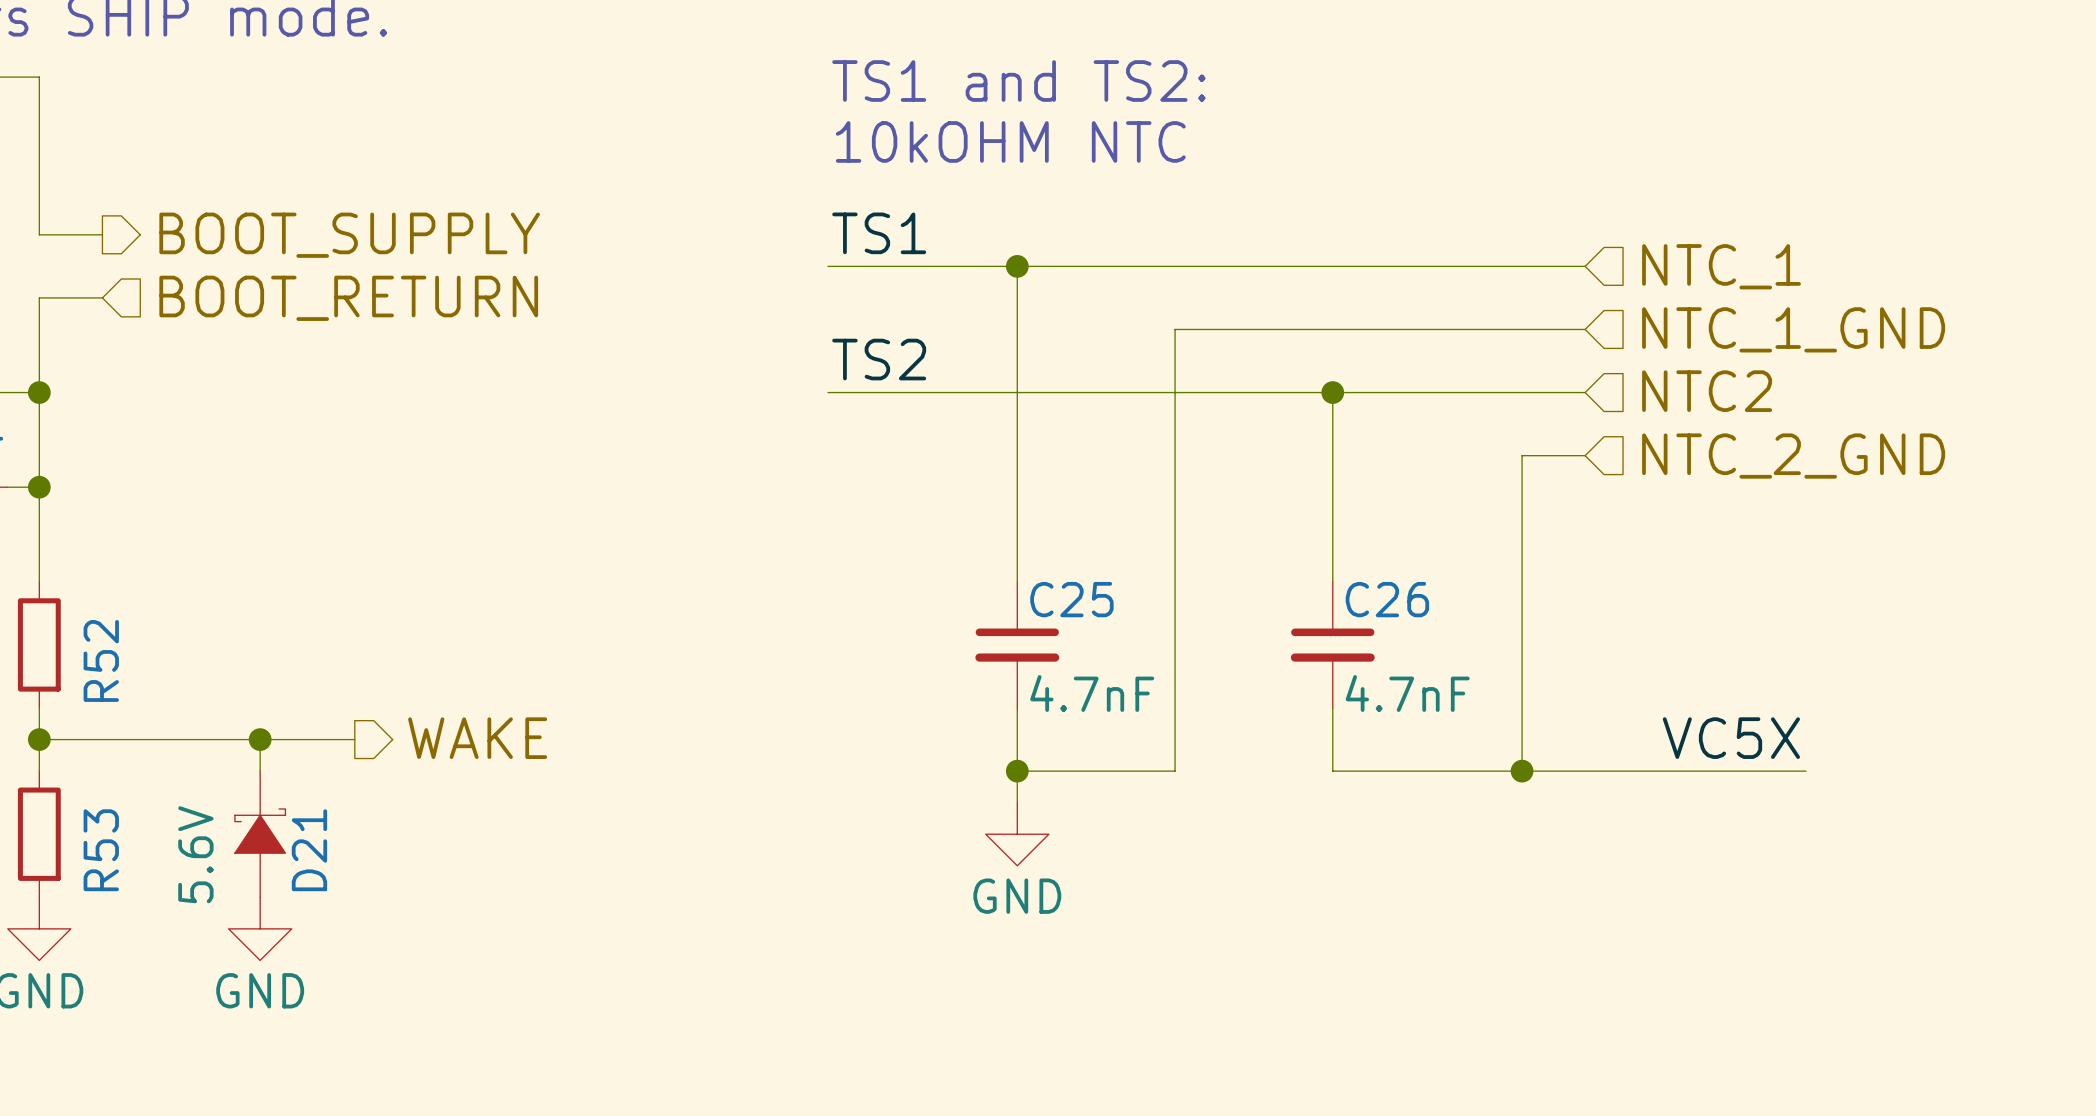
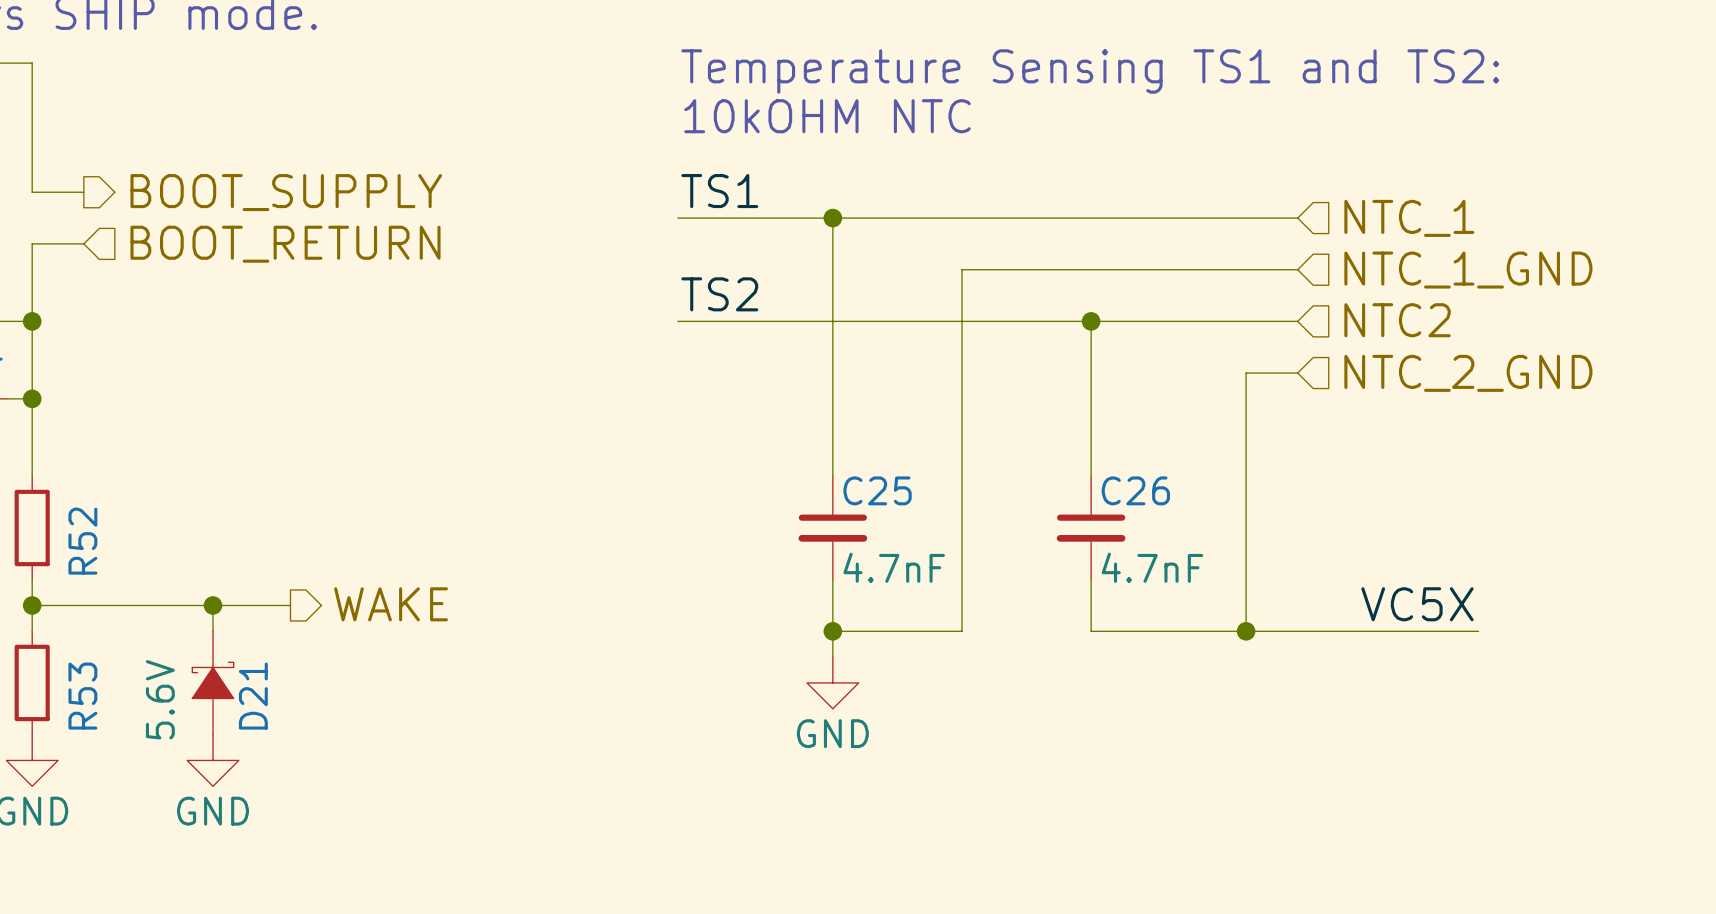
text: TS1 and TS2: (1018, 81) -> Temperature Sensing TS1 and TS2: (1090, 71)

